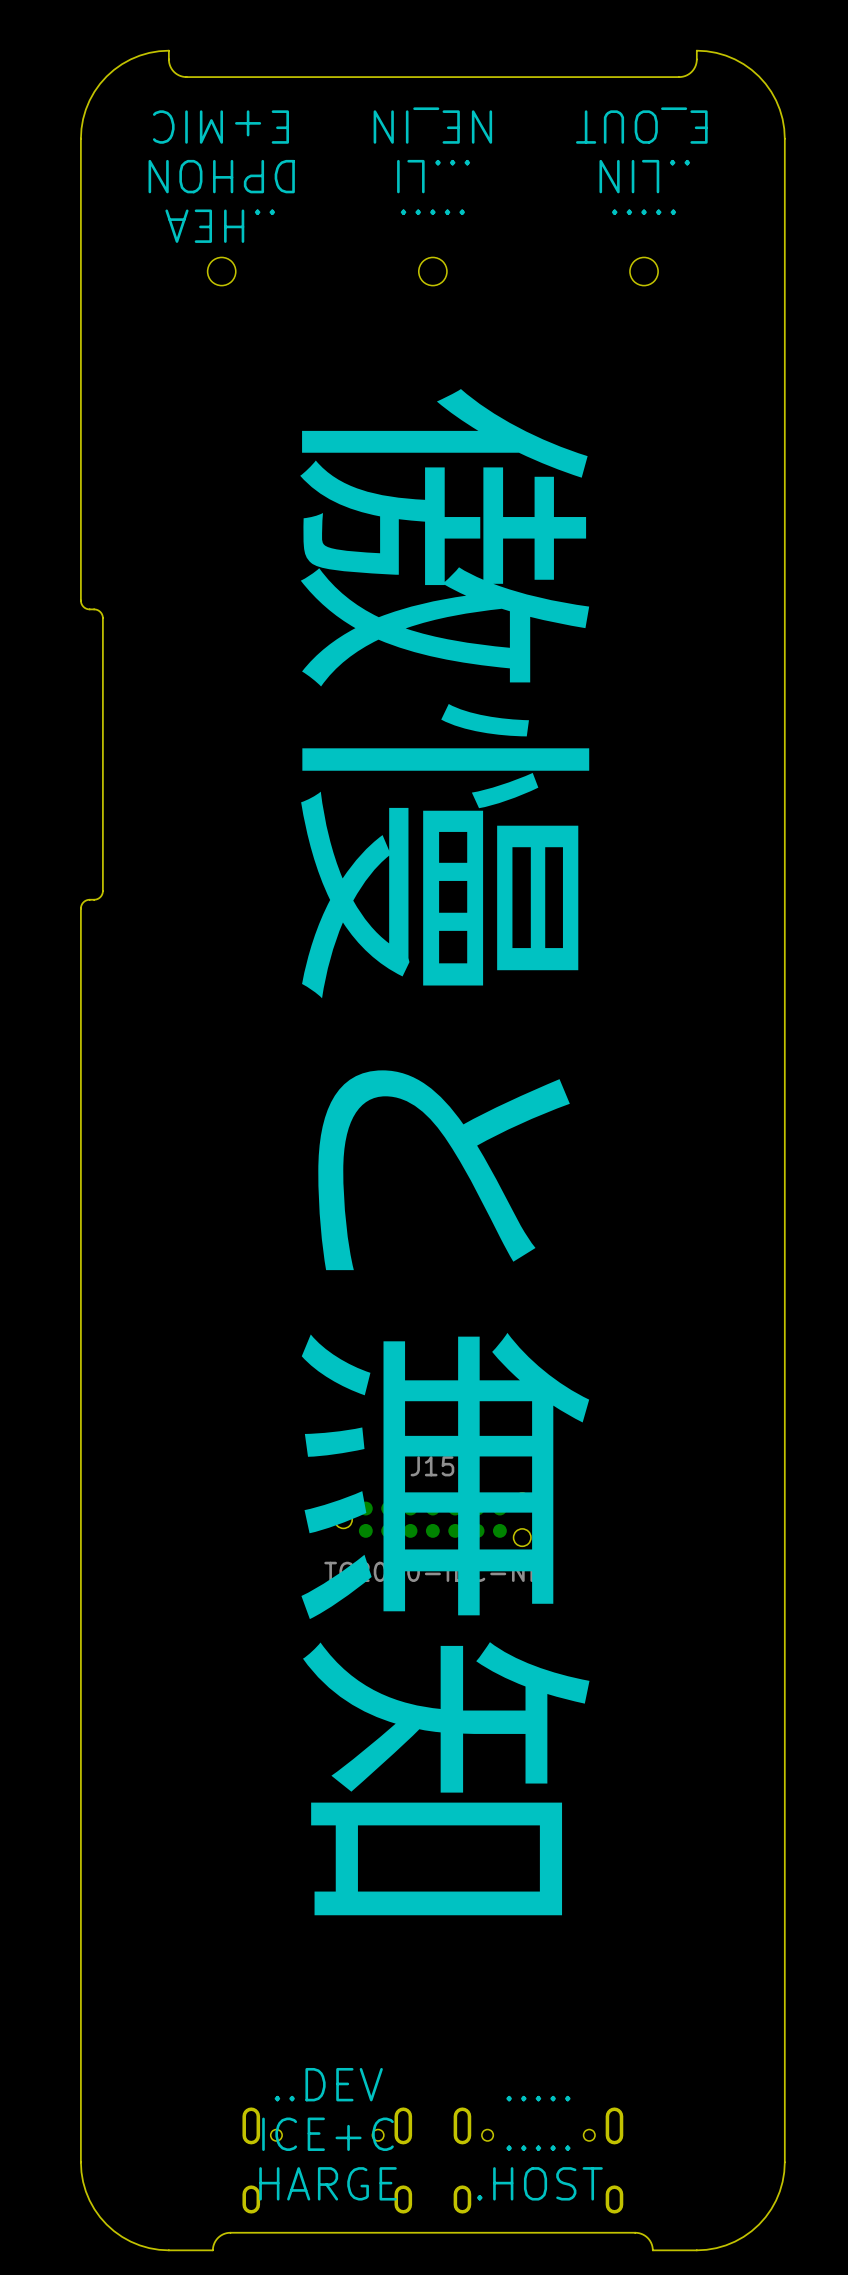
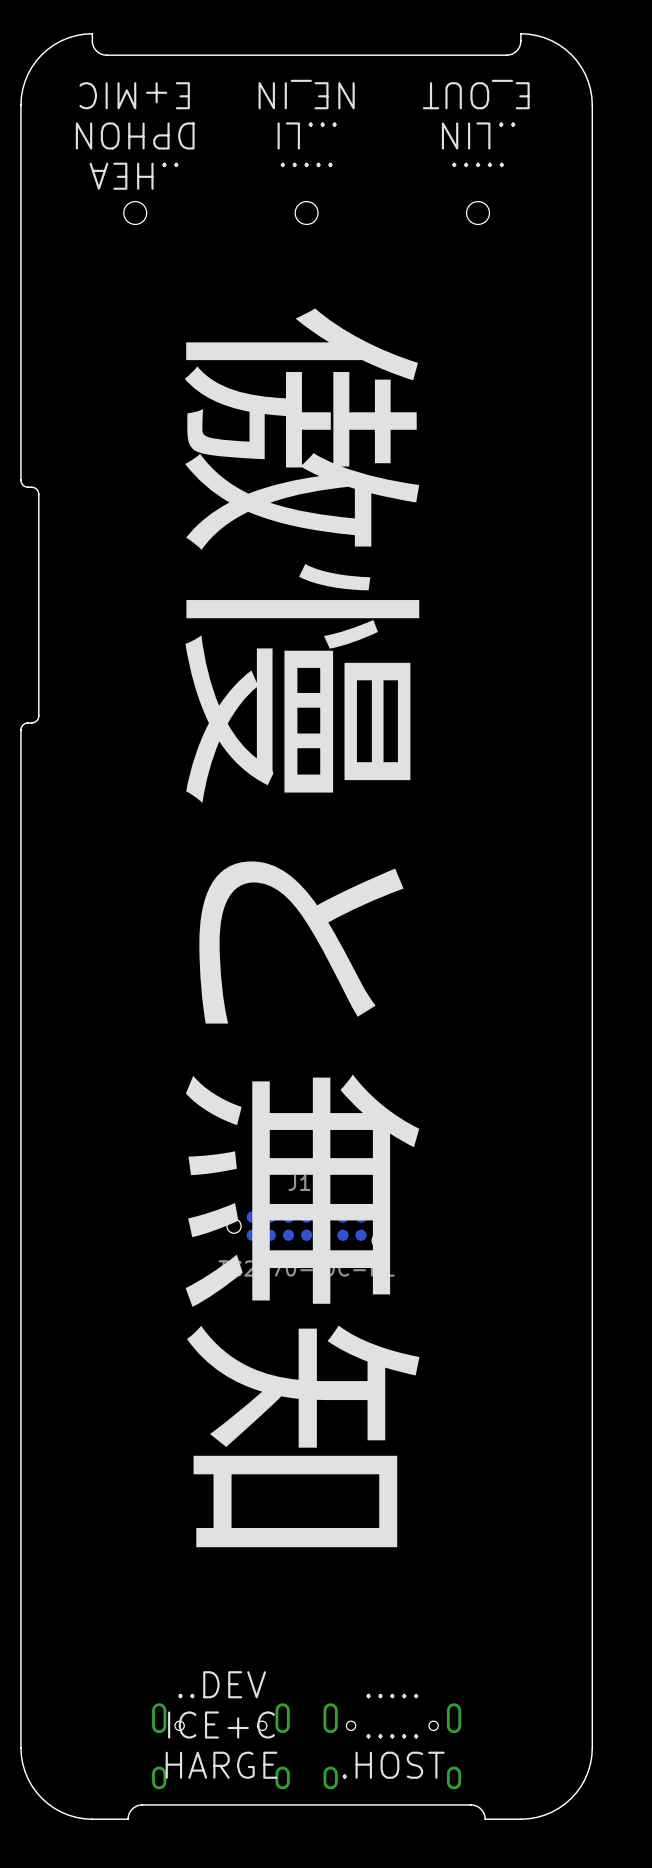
text position: 傲慢と無知 (444, 1152) -> 傲慢と無知 (302, 927)

